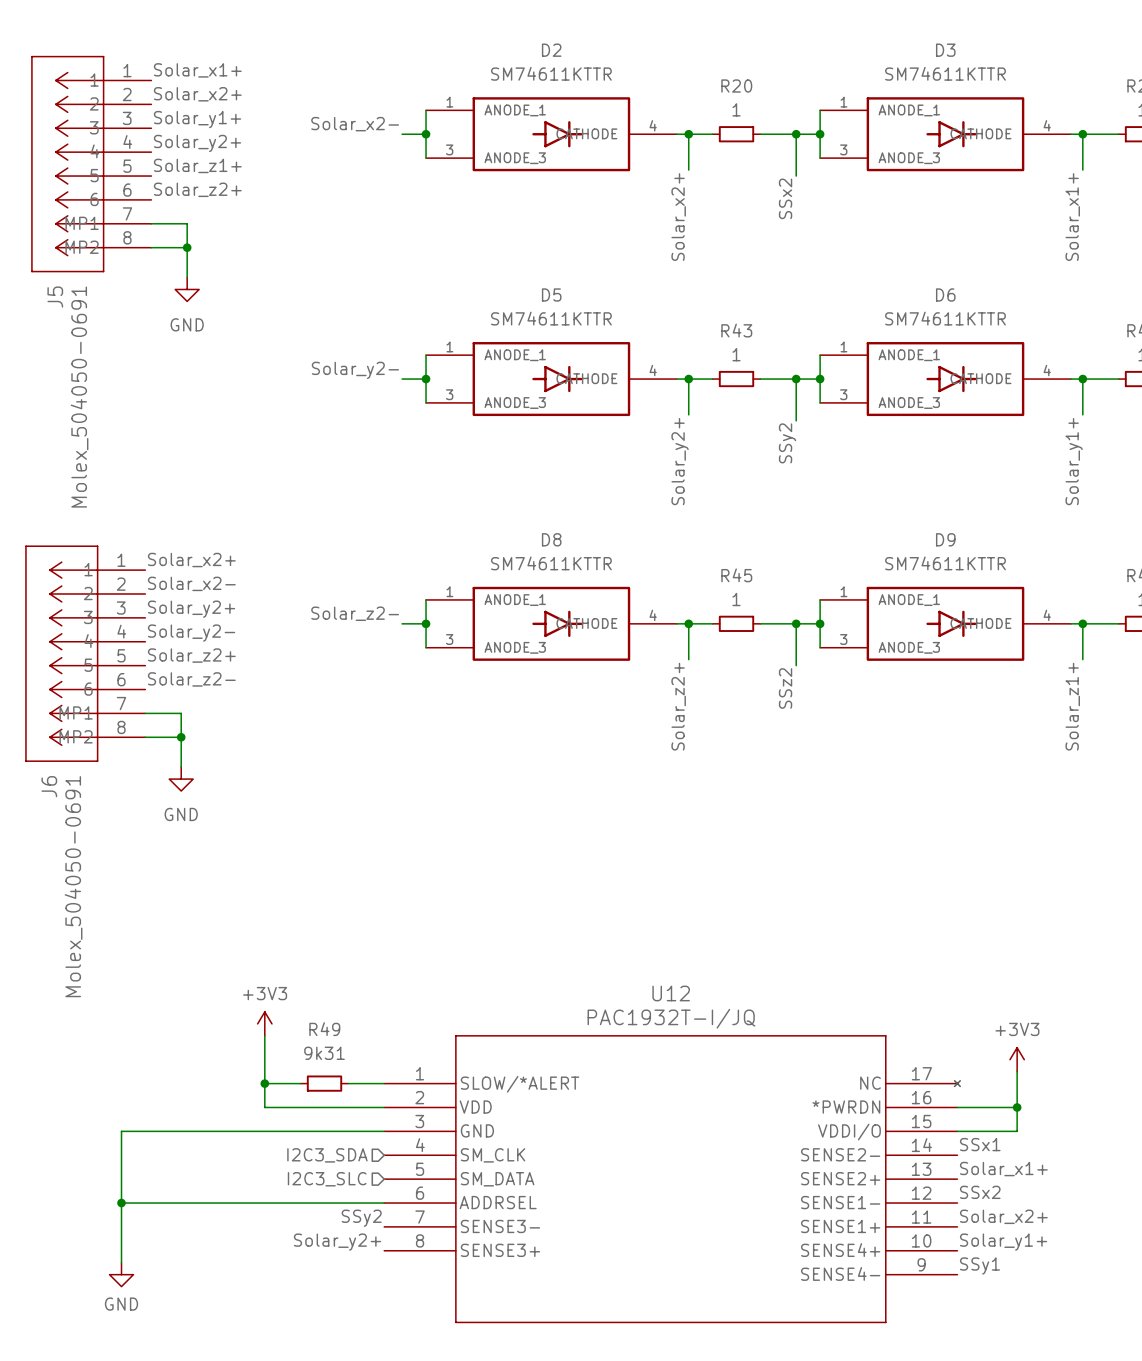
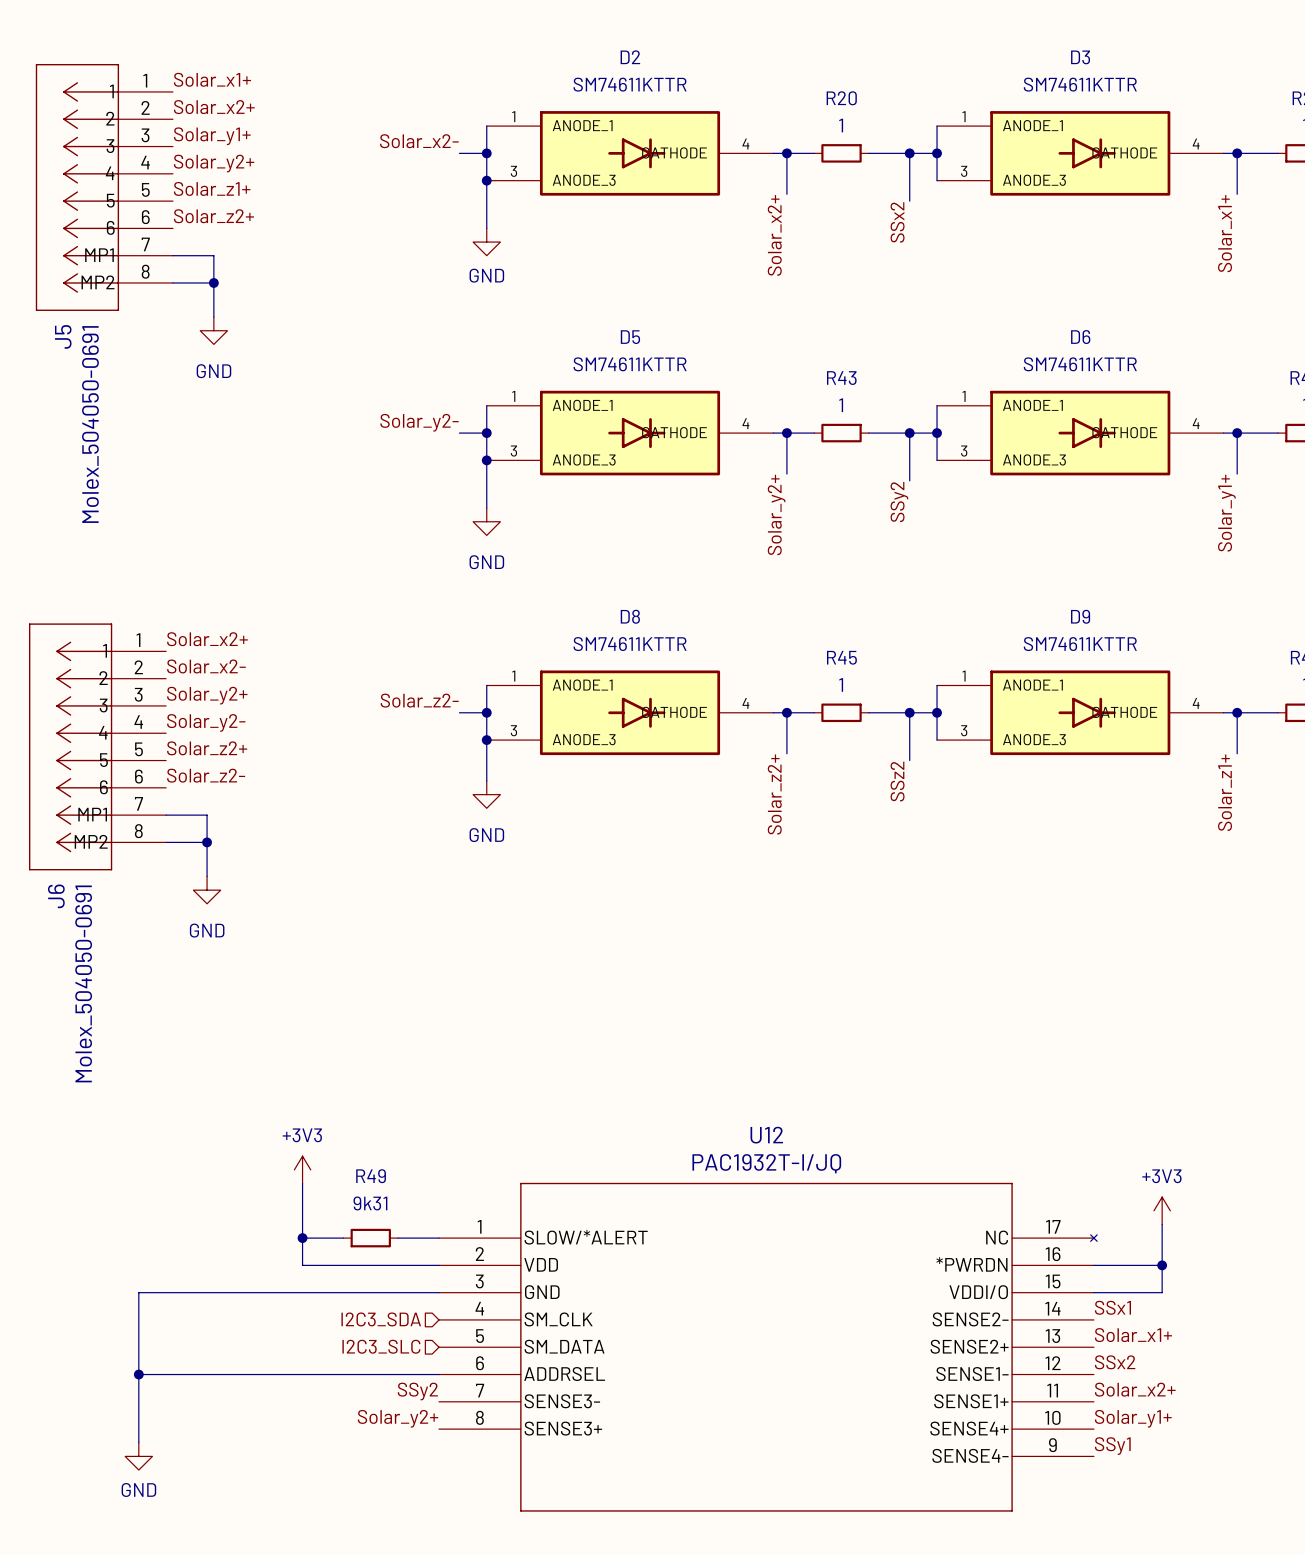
wire: none -> (486, 180) (486, 228)
junction: none -> (486, 180)
power symbol: none -> GND (486, 242)
wire: none -> (486, 460) (486, 508)
junction: none -> (486, 460)
power symbol: none -> GND (486, 521)
wire: none -> (486, 740) (486, 781)
junction: none -> (486, 740)
power symbol: none -> GND (486, 794)

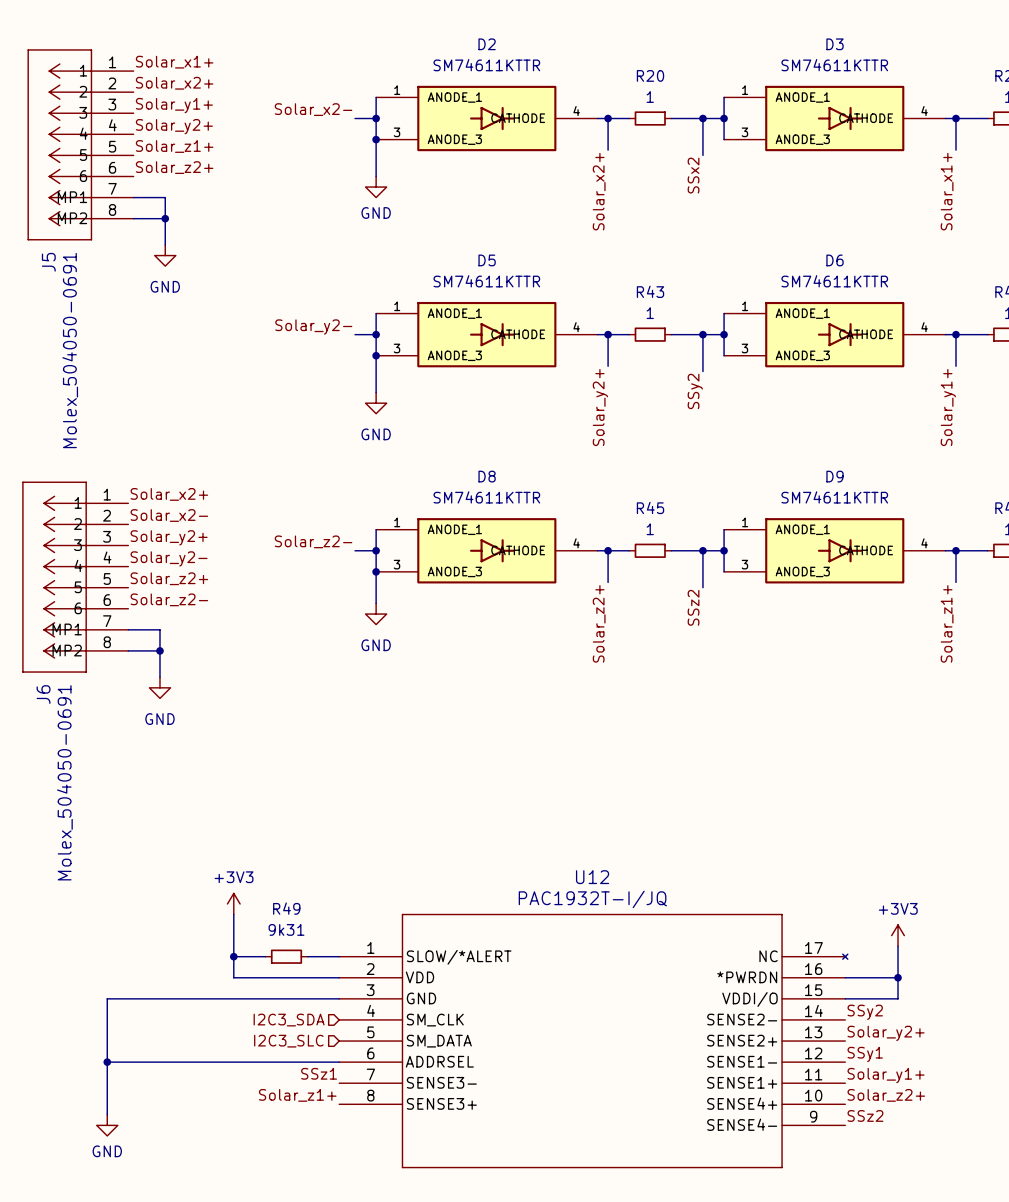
label: SSx1 (1112, 1307) -> SSy2 (865, 1012)
label: Solar_x1+ (1133, 1335) -> Solar_y2+ (886, 1033)
label: SSx2 (1115, 1362) -> SSy1 (865, 1054)
label: Solar_x2+ (1135, 1389) -> Solar_y1+ (886, 1075)
label: SSy2 (417, 1391) -> SSz1 (319, 1073)
label: Solar_y2+ (398, 1418) -> Solar_z1+ (297, 1095)
label: Solar_y1+ (1133, 1418) -> Solar_z2+ (886, 1095)
label: SSy1 (1112, 1446) -> SSz2 (865, 1115)

